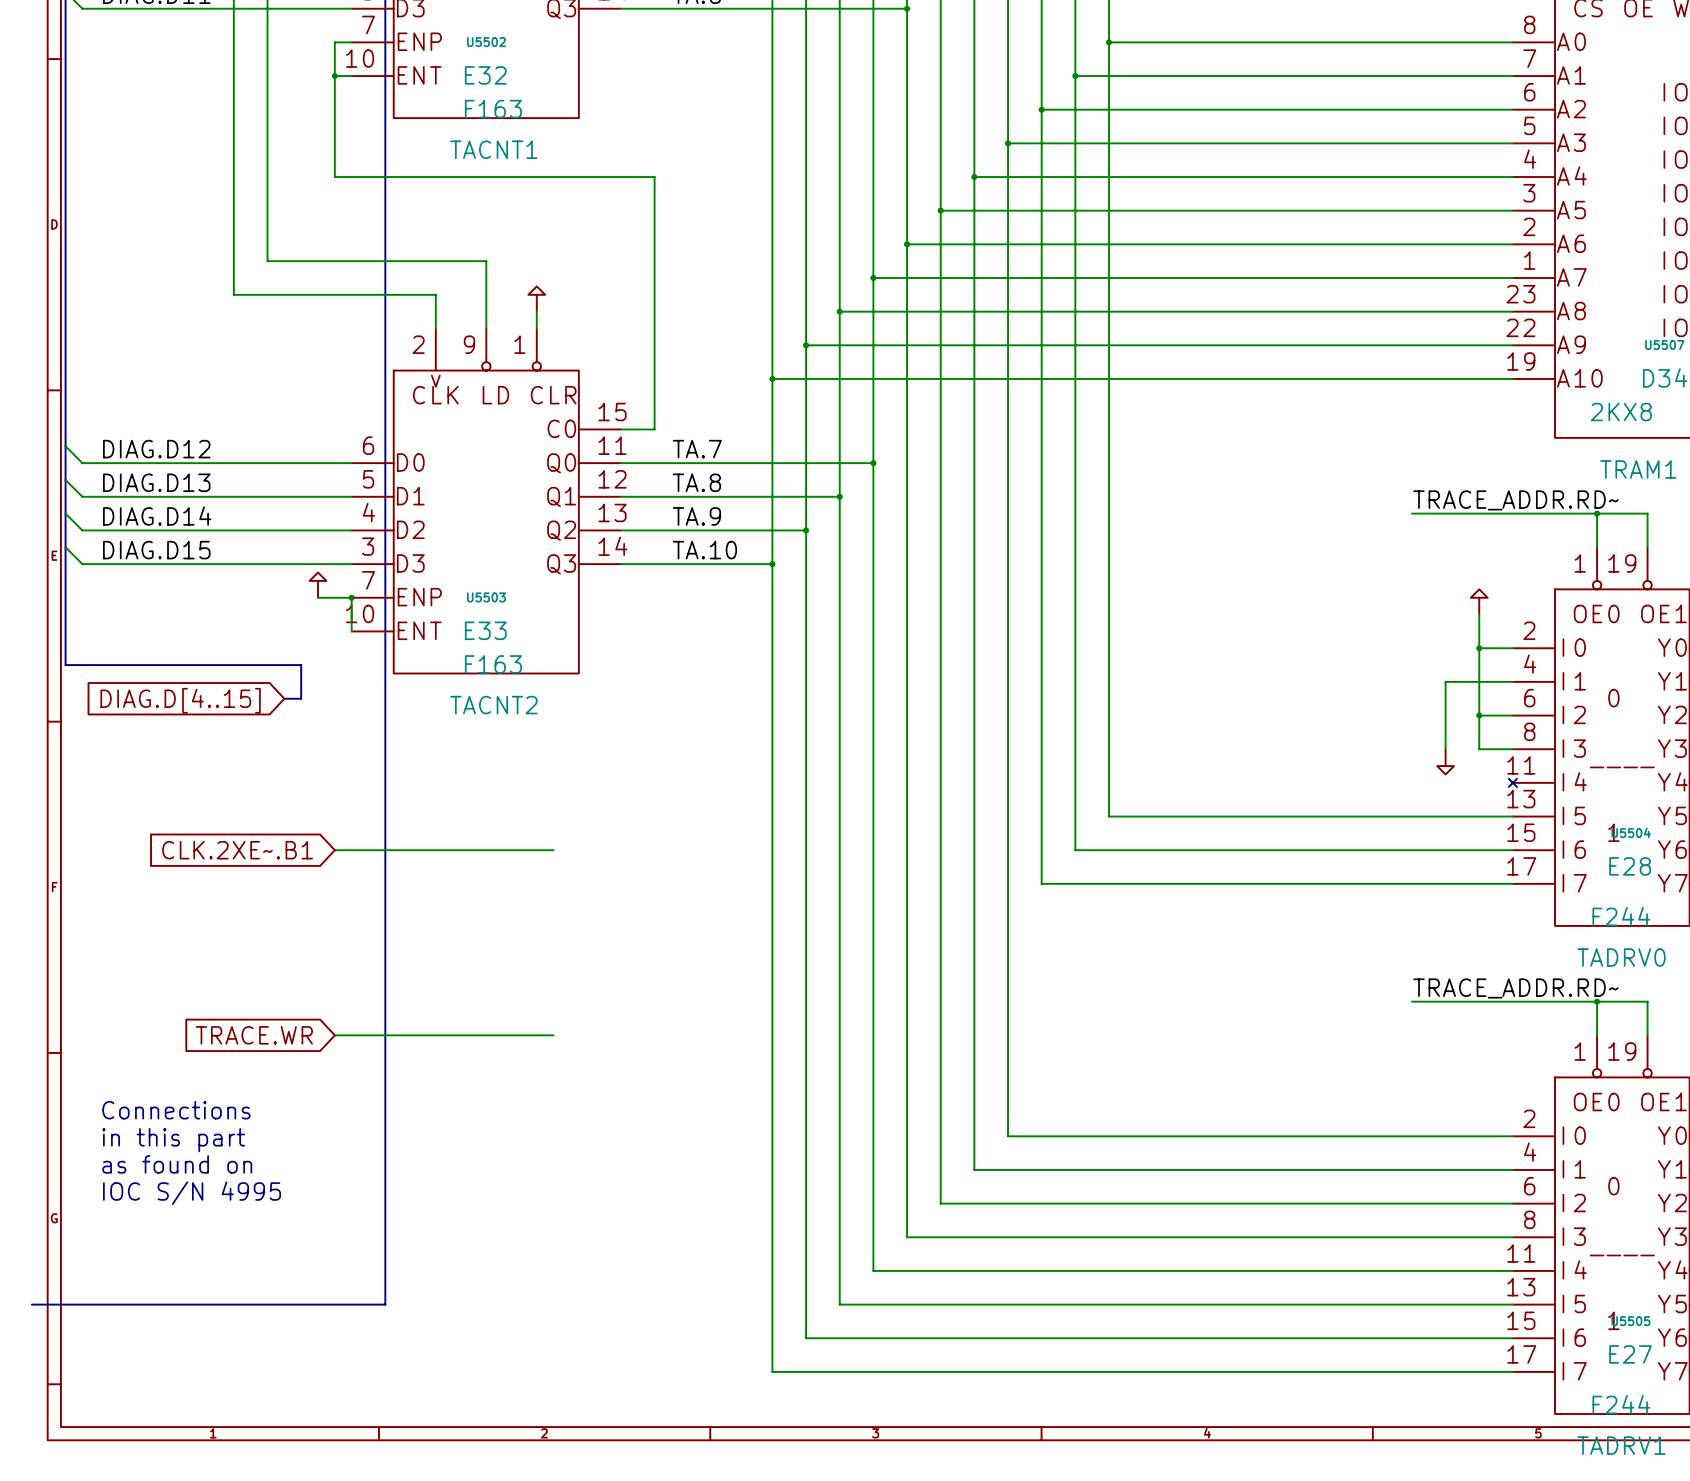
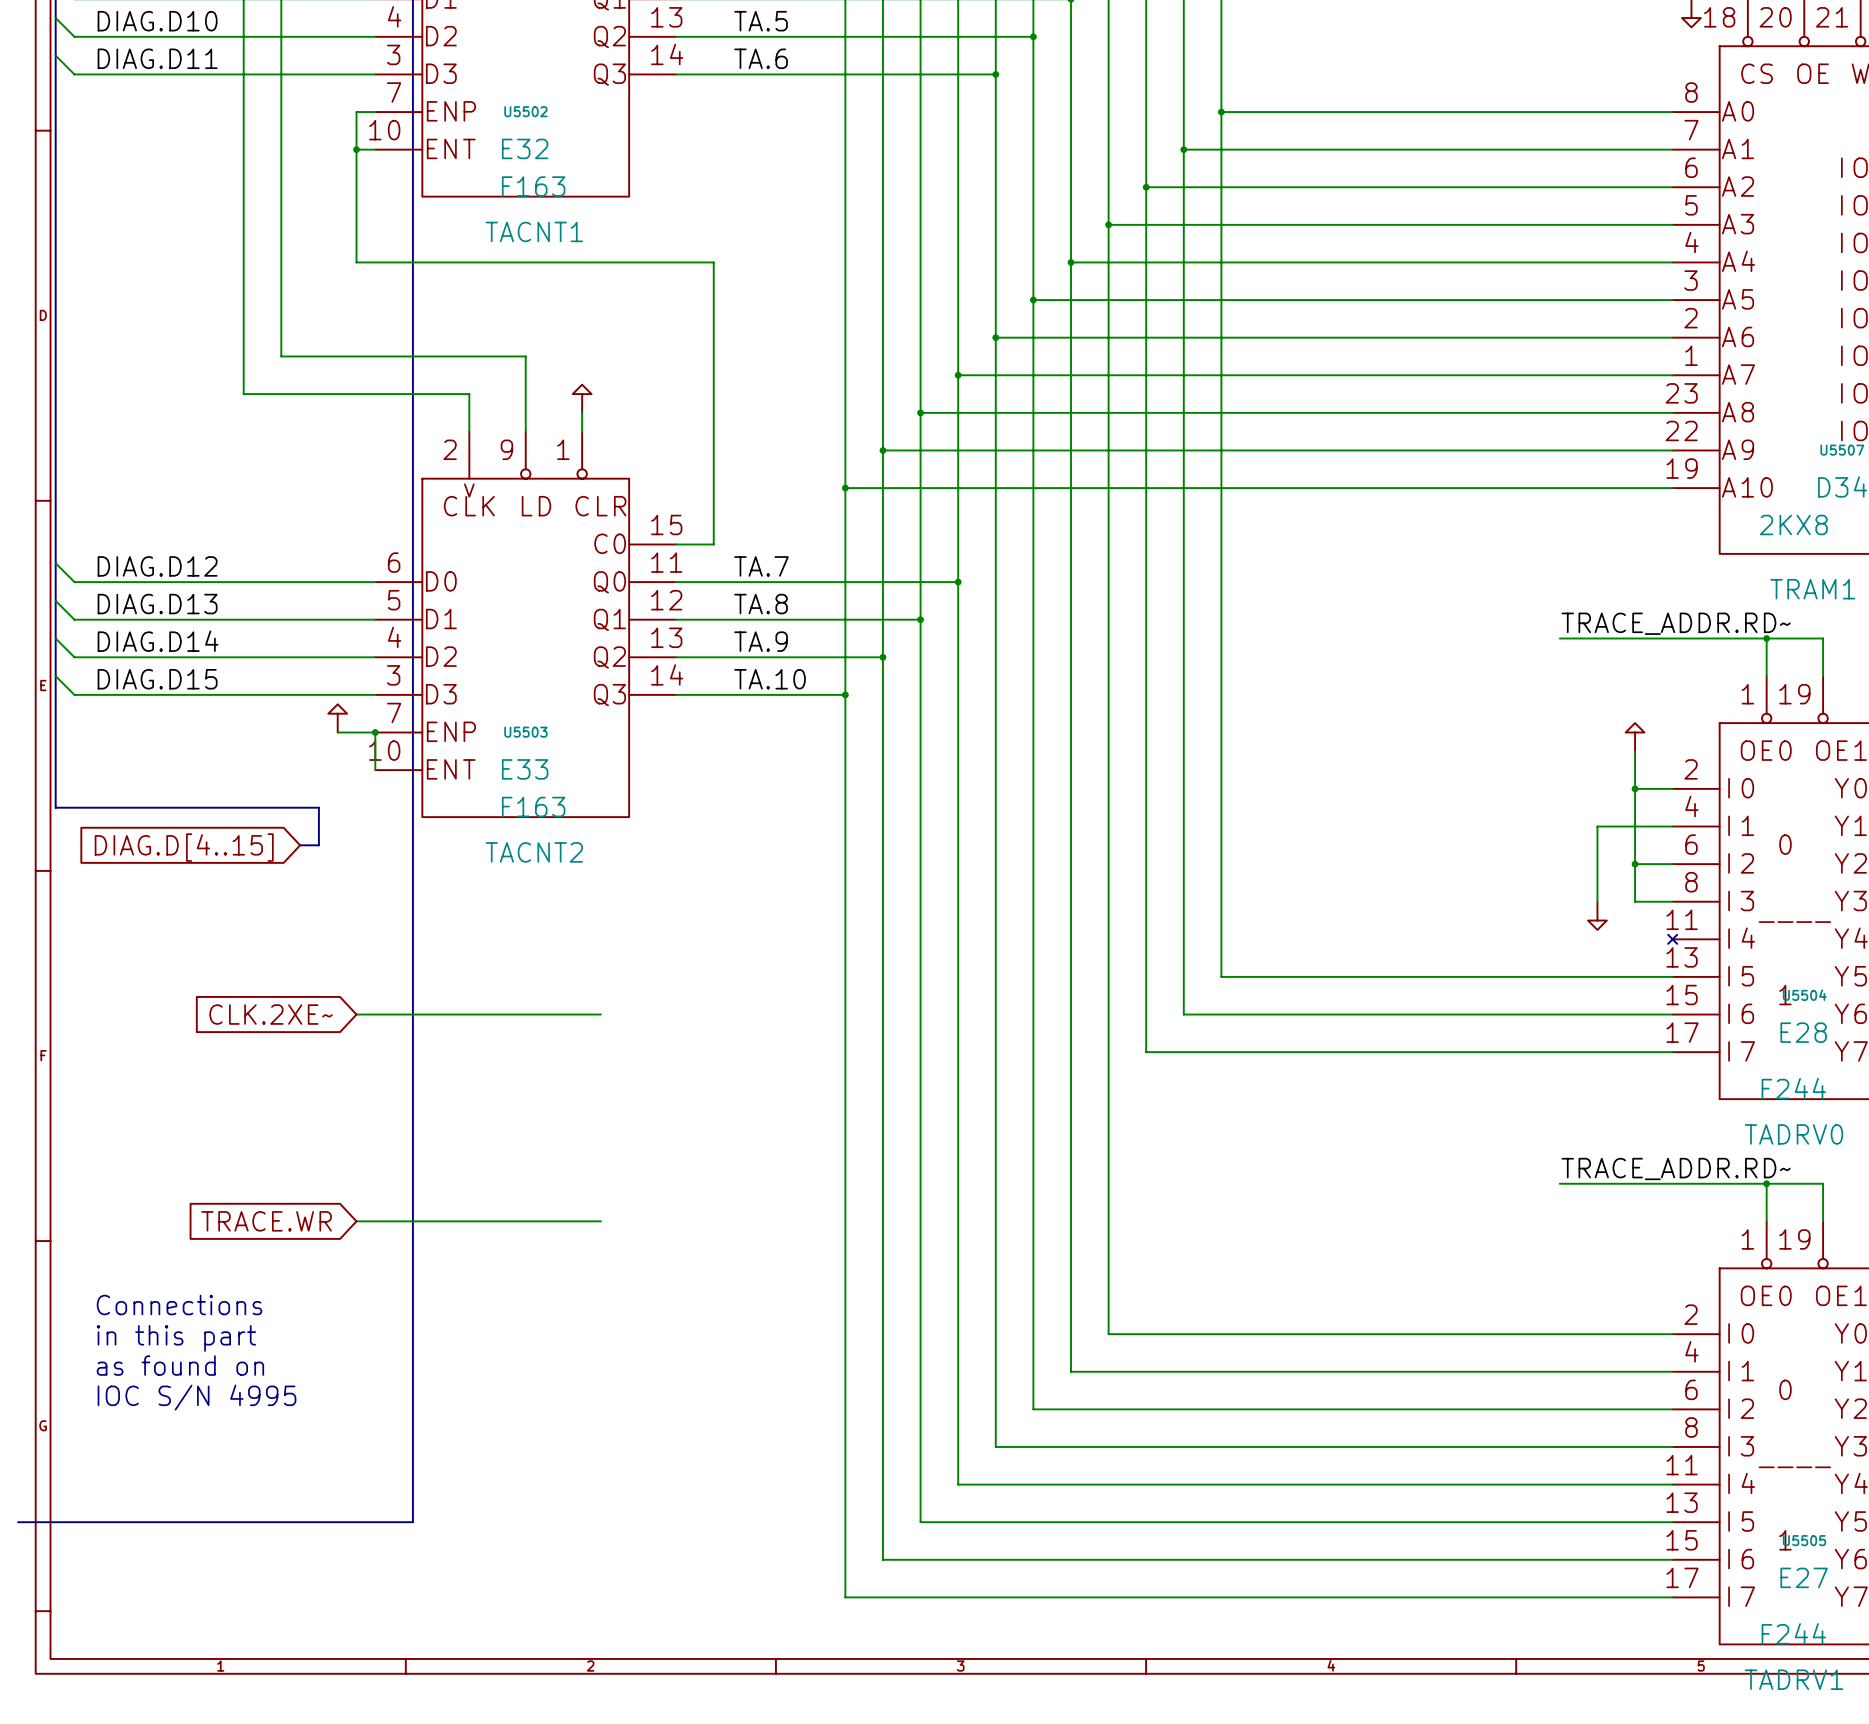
global label: CLK.2XE~.B1 (237, 850) -> CLK.2XE~ (271, 1014)

